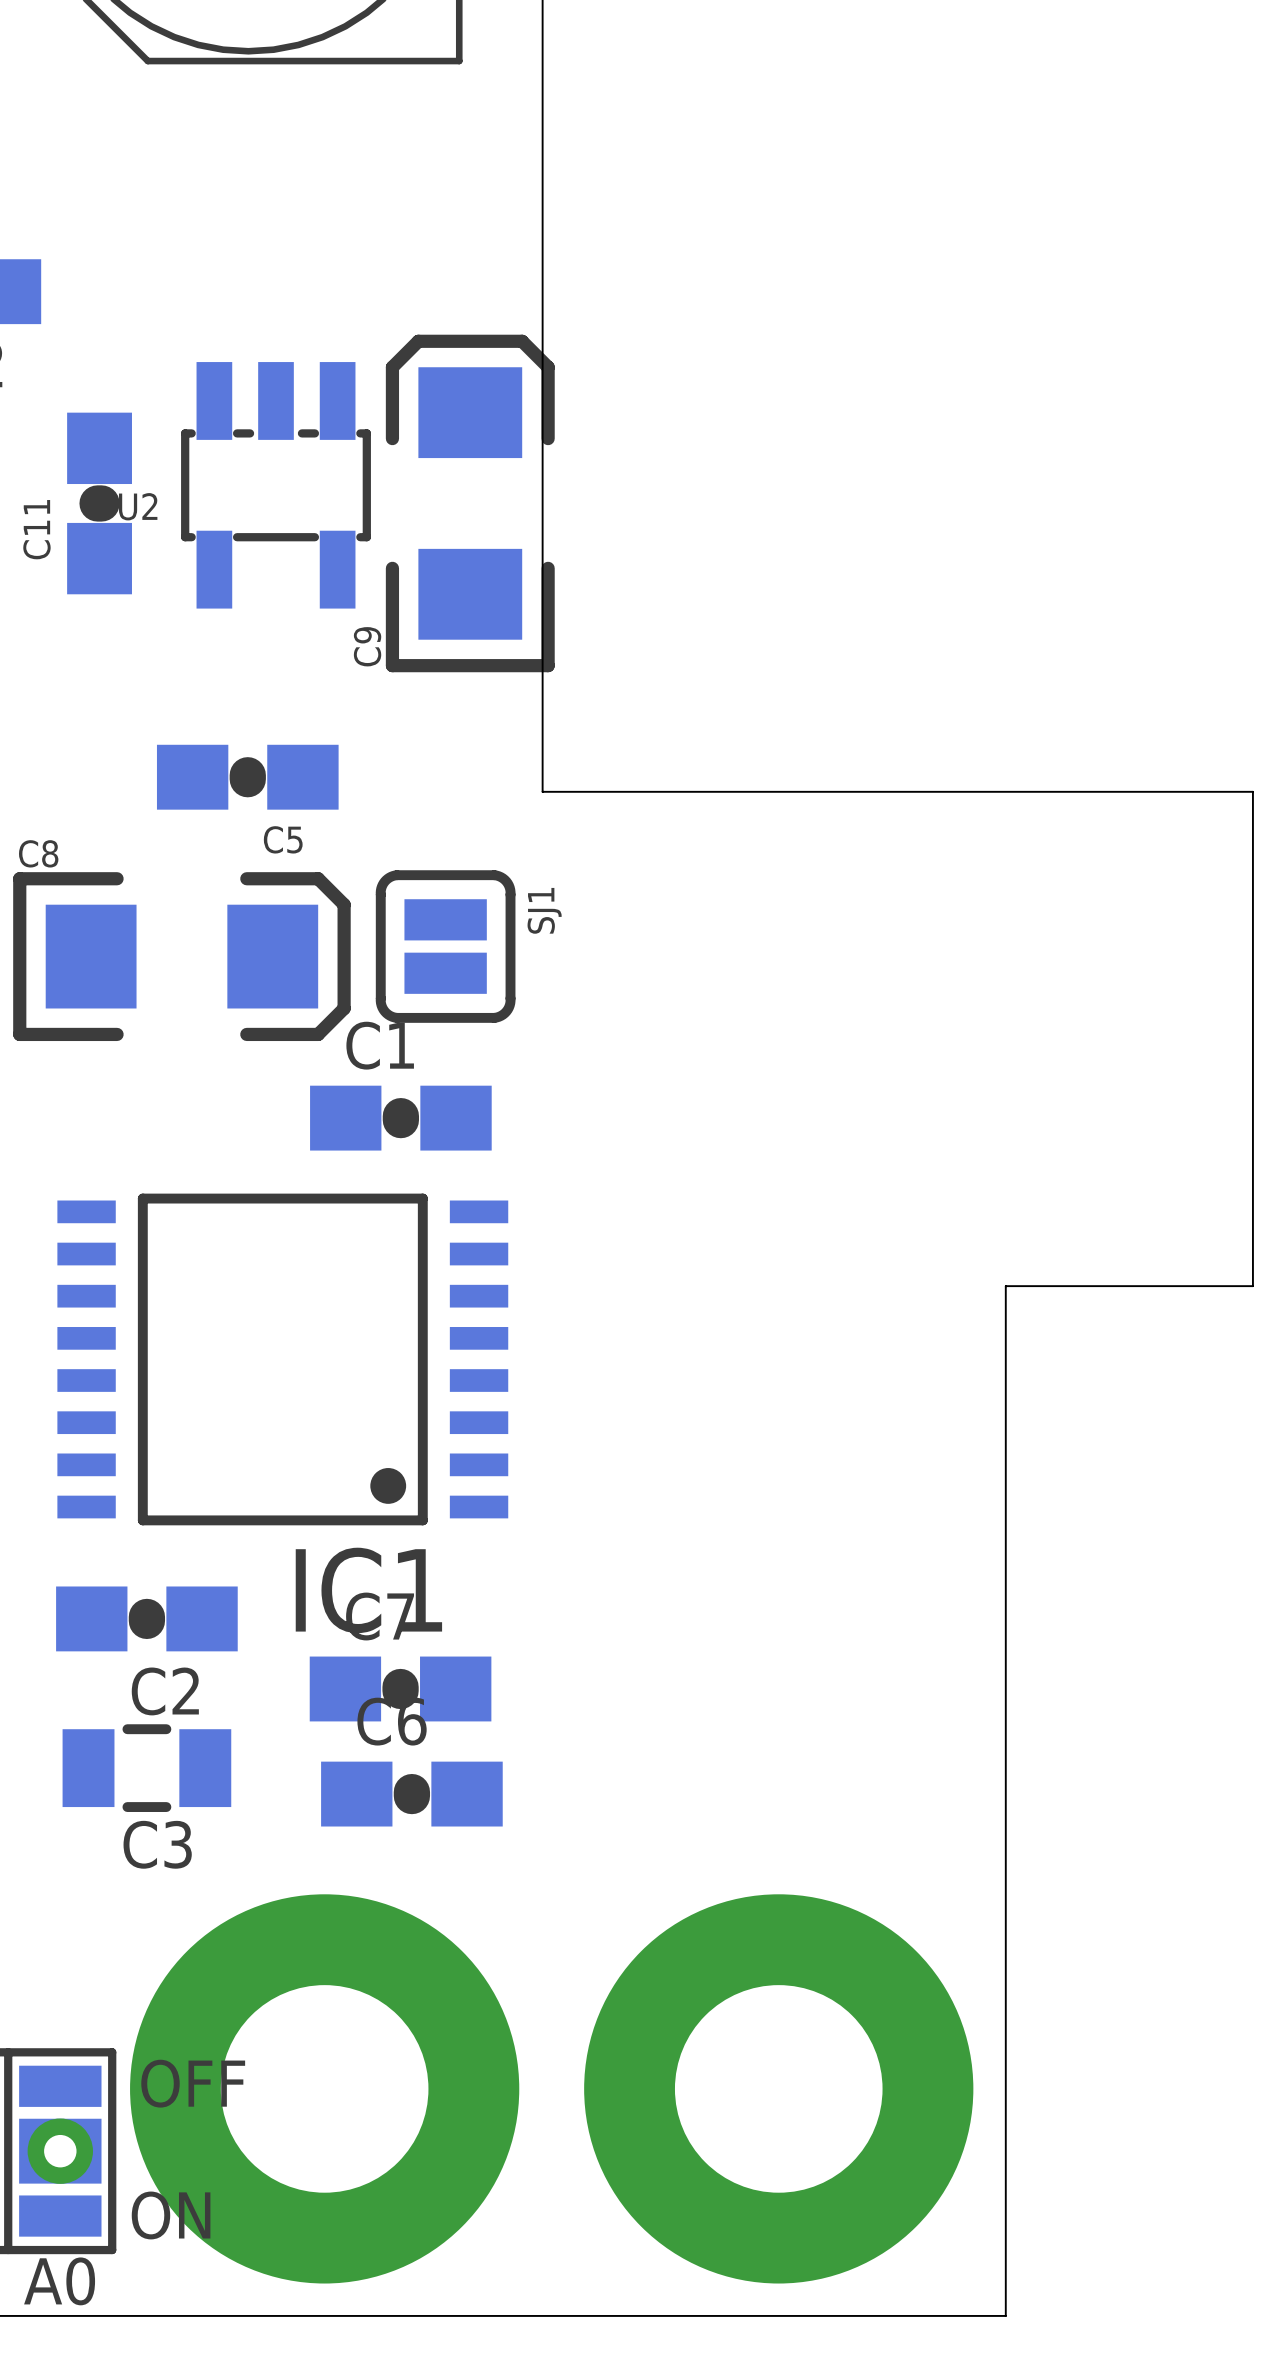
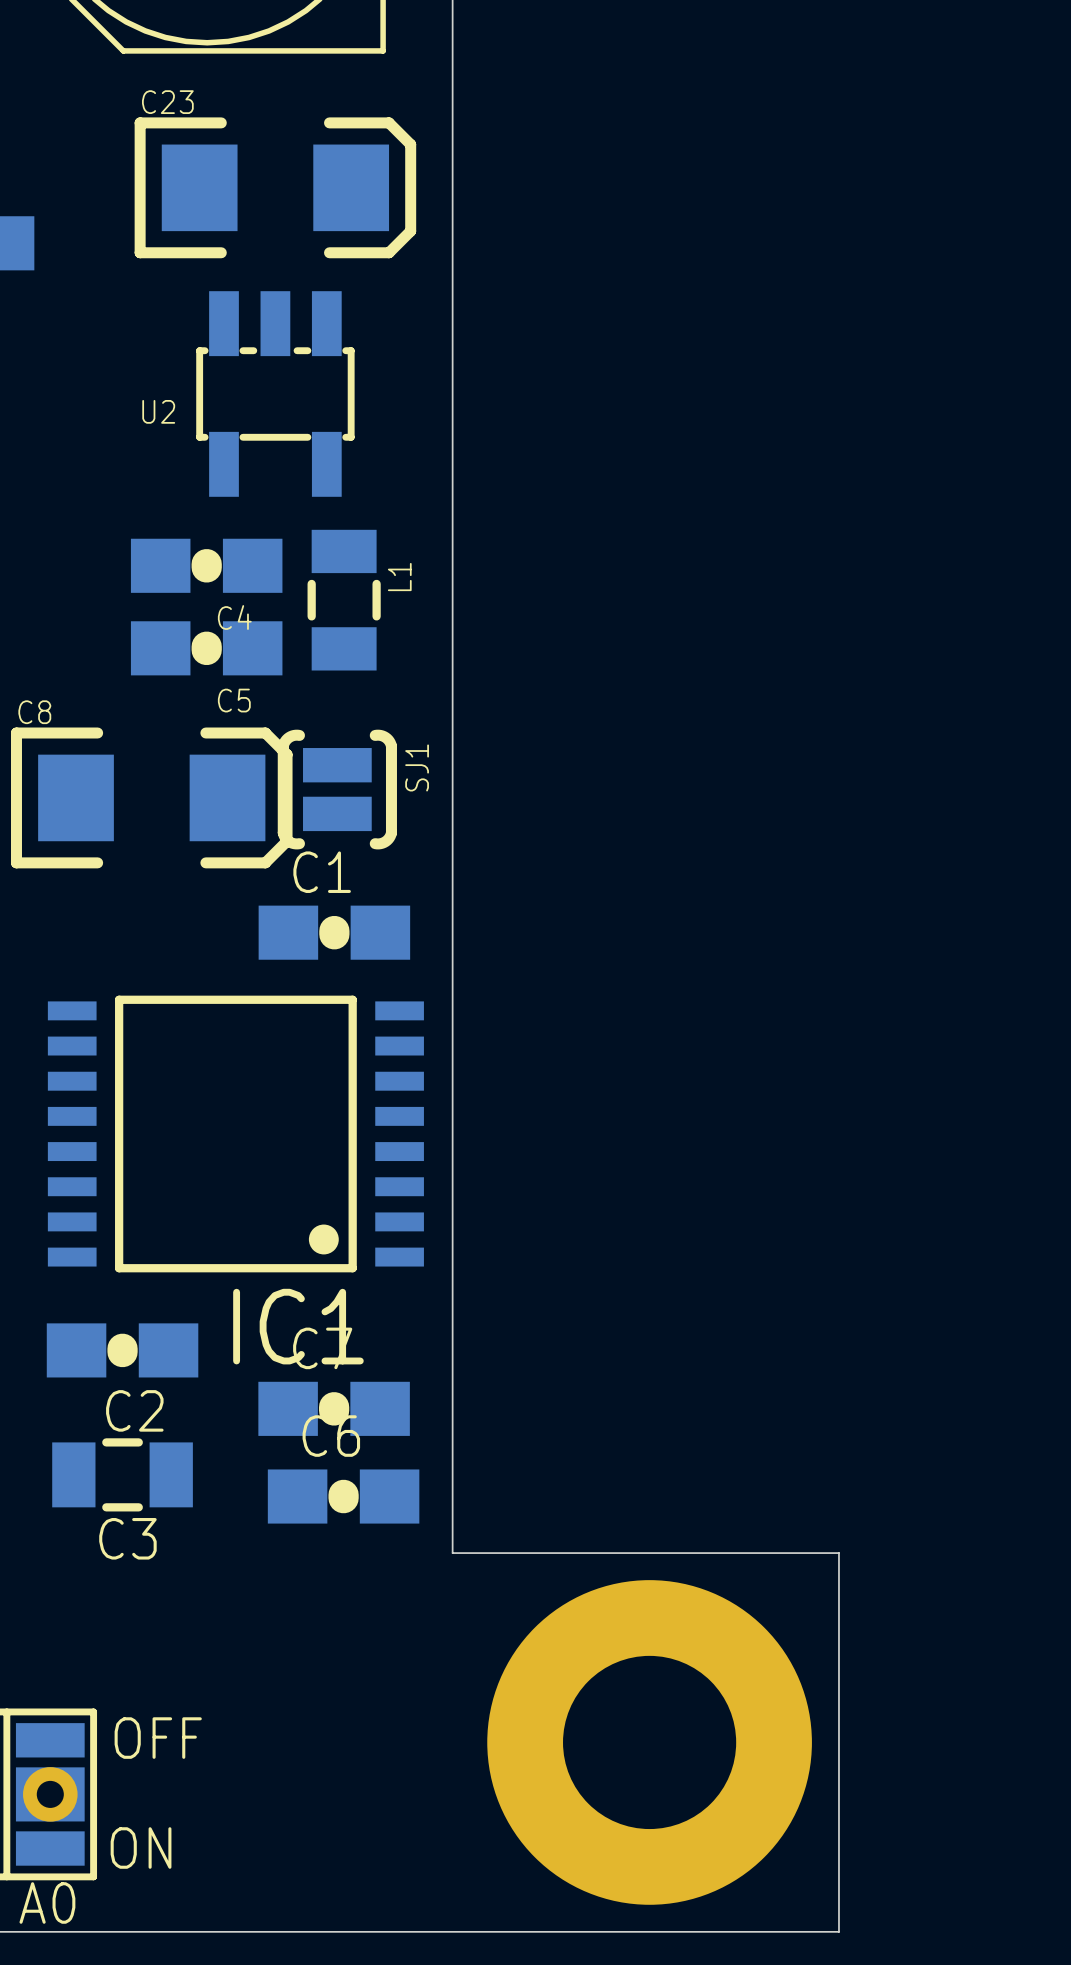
C23: none -> (275, 187)
U2 position: (276, 485) -> (275, 393)
C11: (99, 503) -> none
C9: (470, 503) -> none
C4: none -> (206, 565)
L1: none -> (344, 600)
board edge: (542, 791) (1252, 791) (1252, 1286) (1005, 1286) (1005, 1861) -> (452, 660) (452, 1553) (838, 1553)
SJ1 footprint: [375, 870, 516, 1023] -> [277, 729, 397, 850]
SJ1 name position: SJ1 (544, 910) -> SJ1 (417, 767)
part: (324, 2088) -> none

